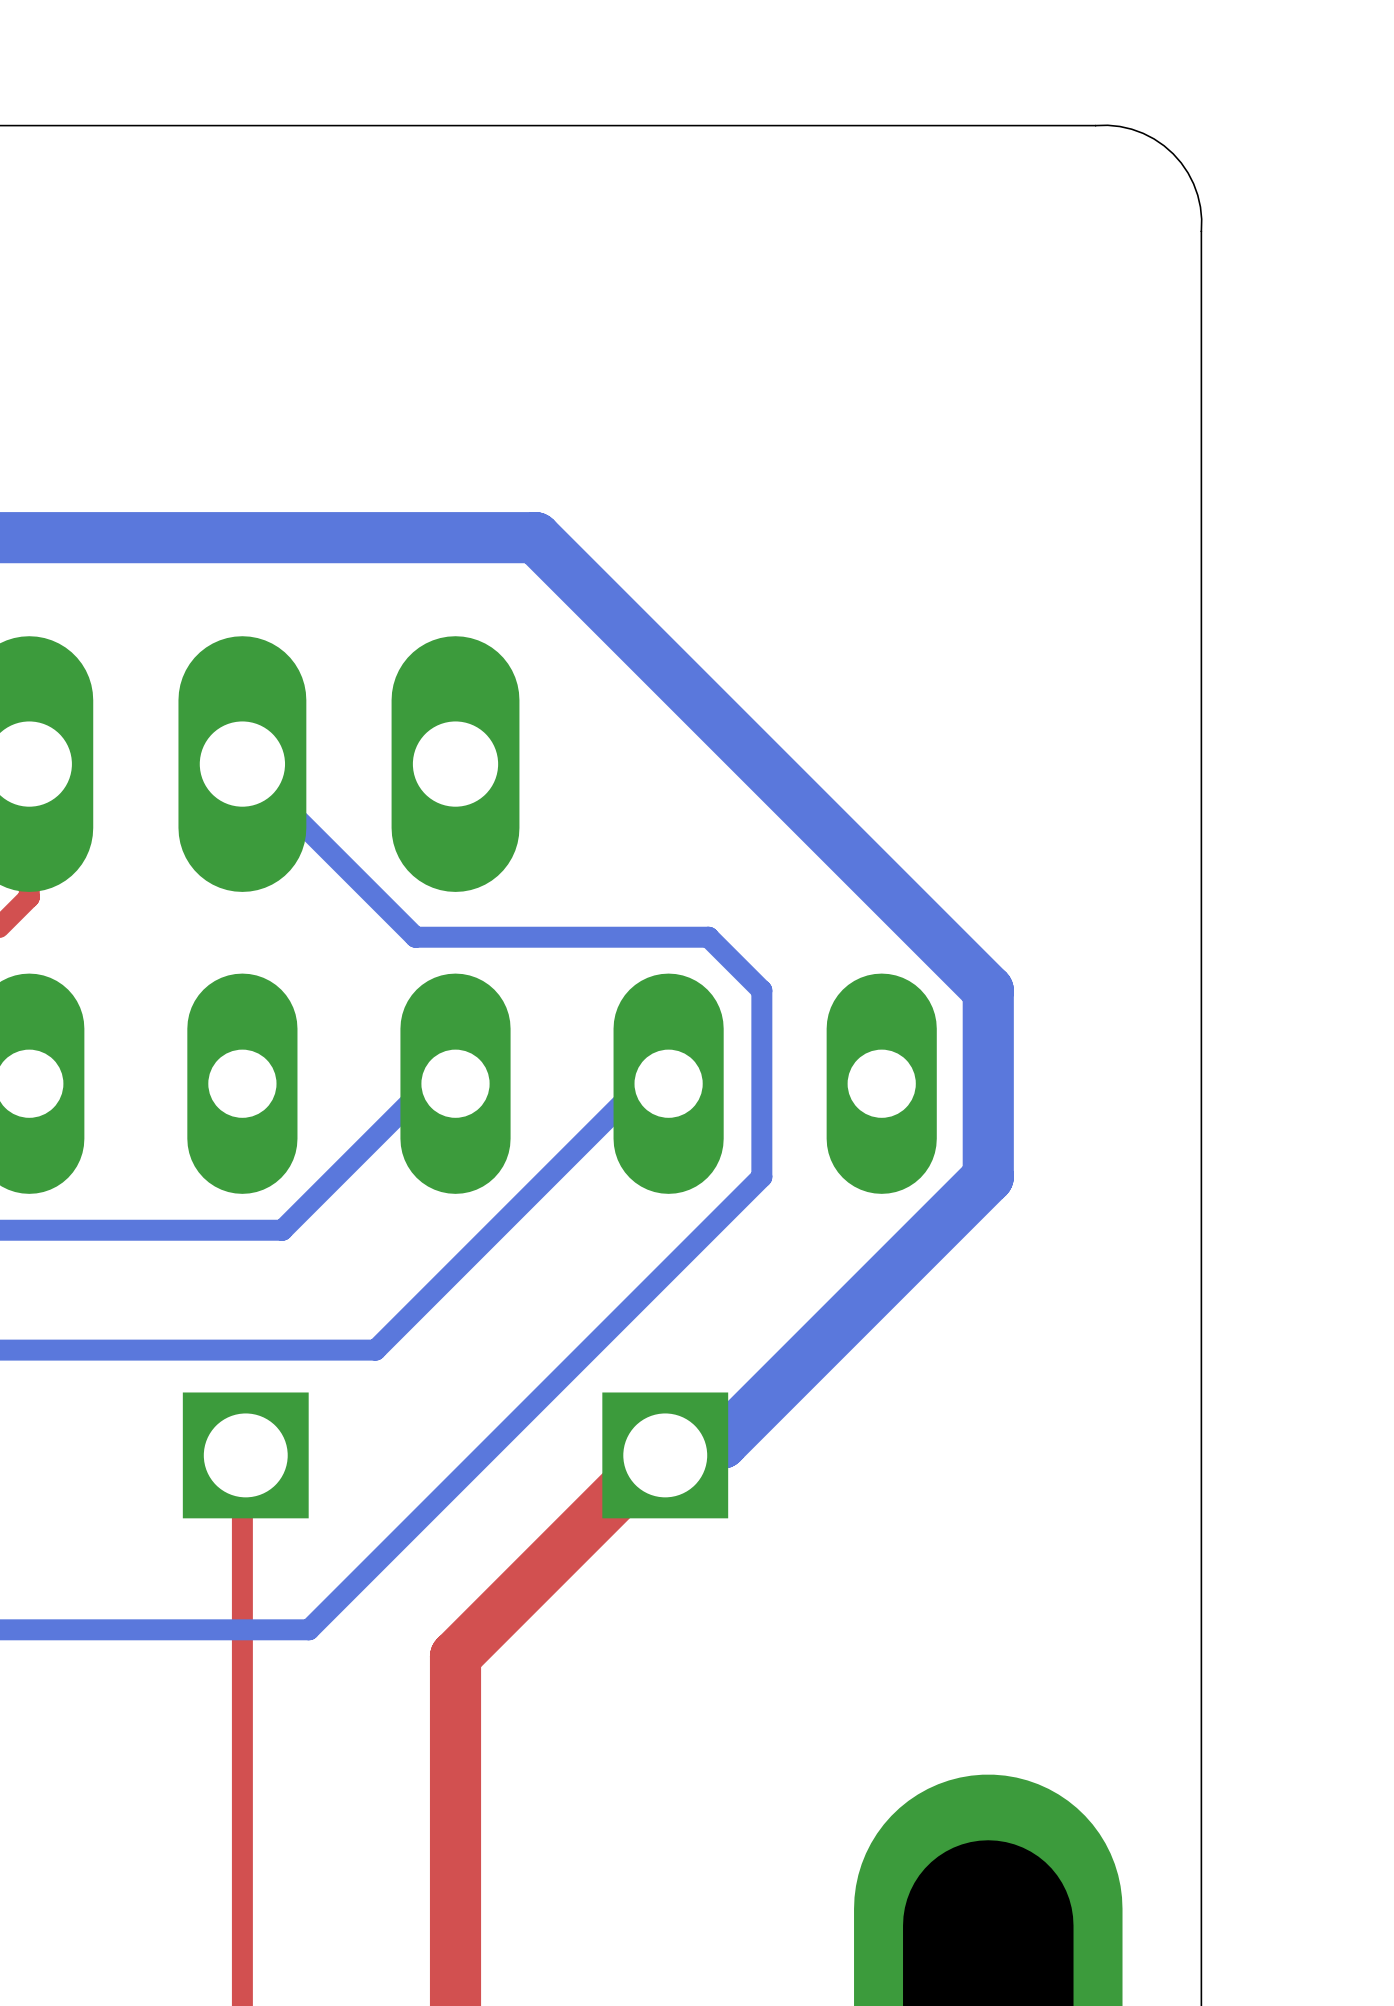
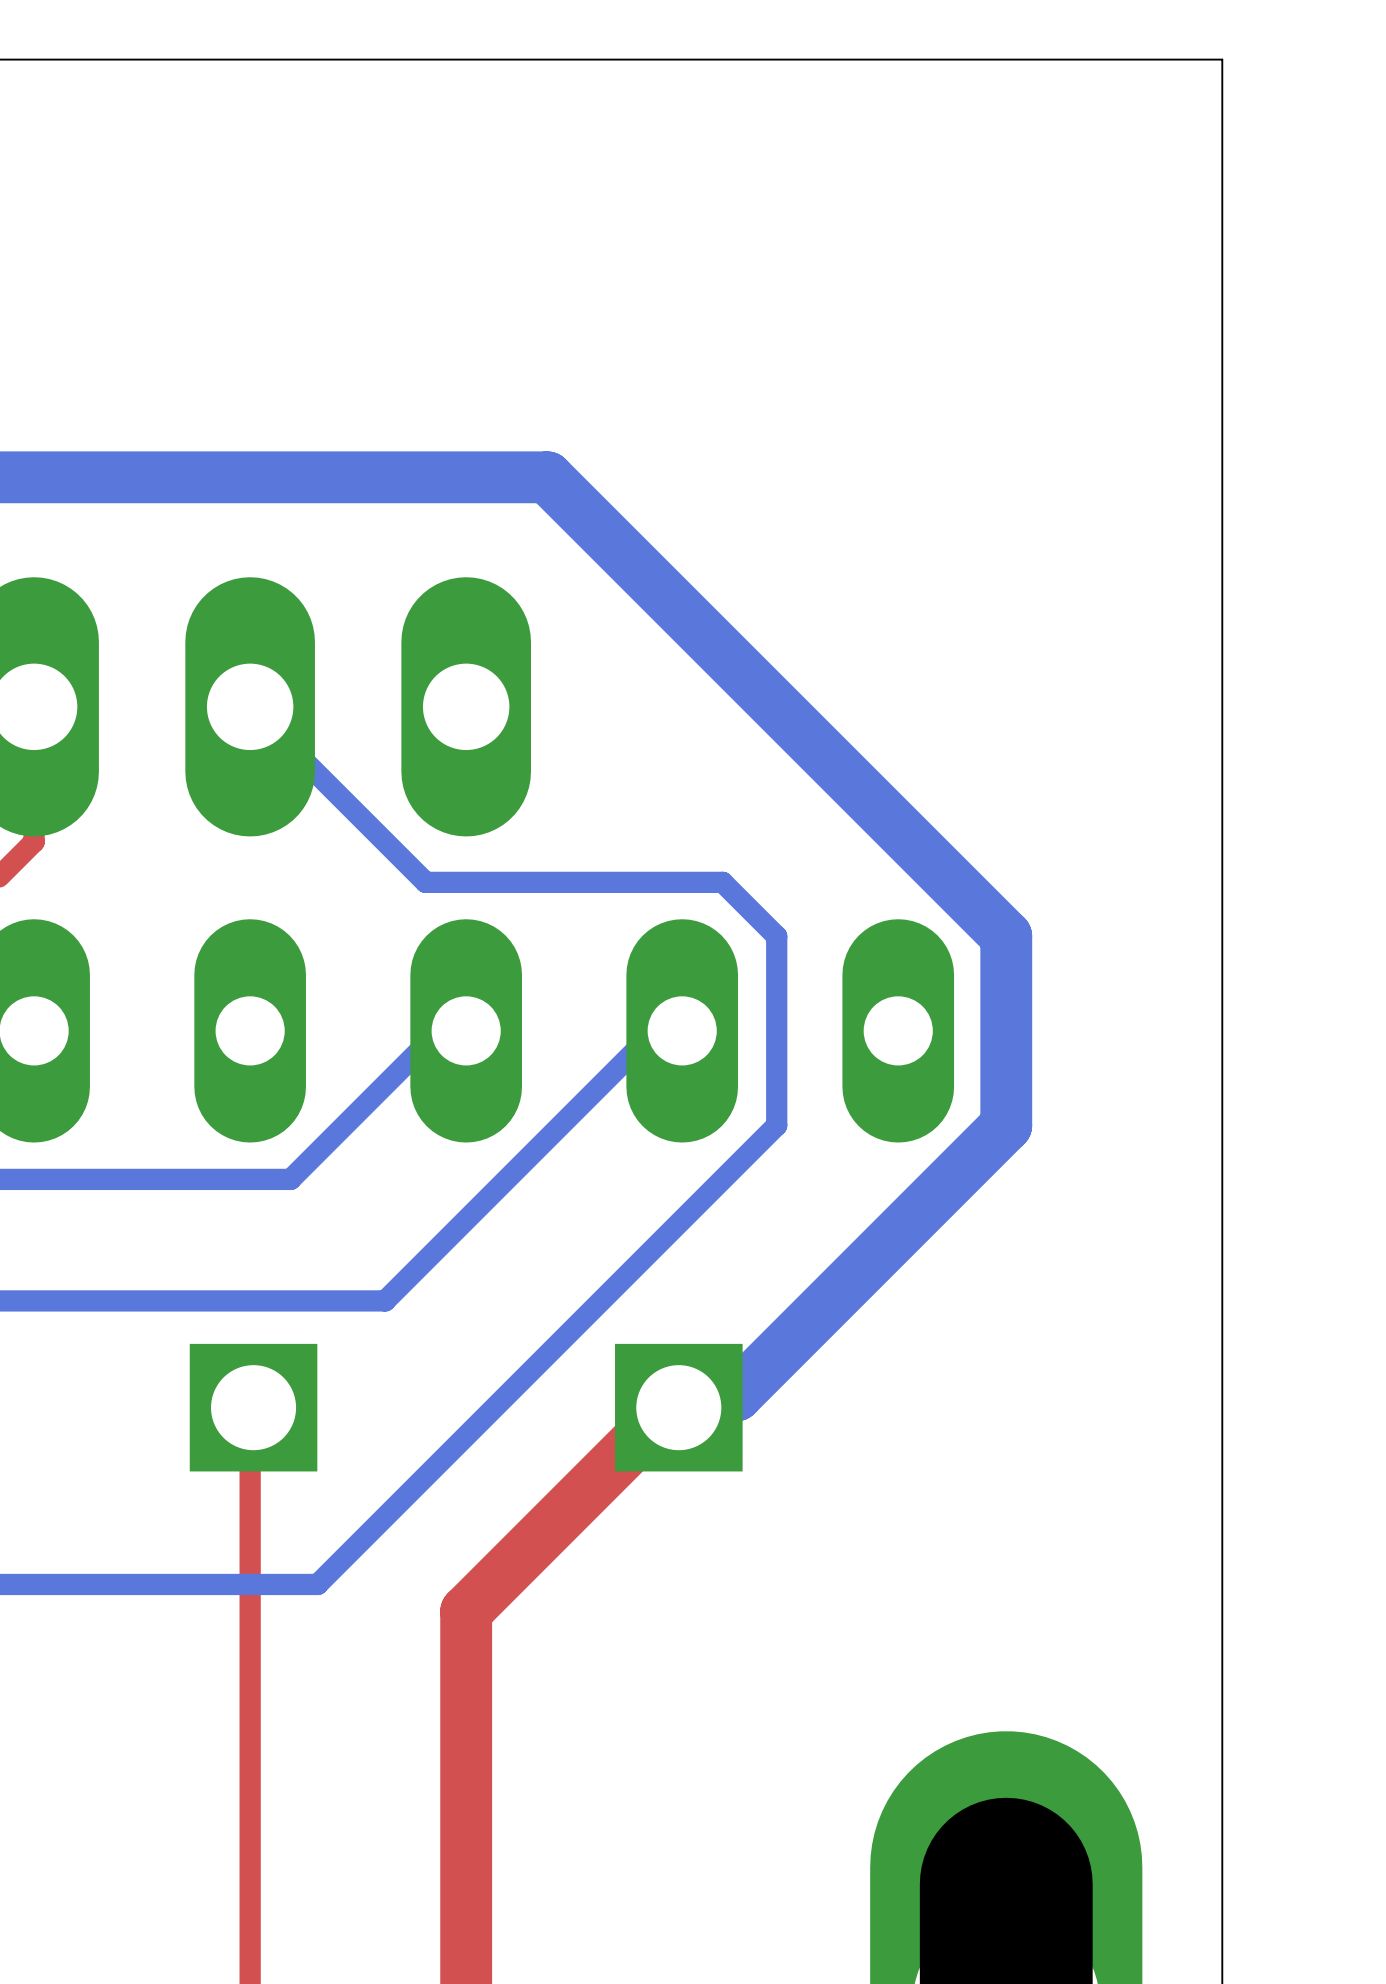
board edge: (1095, 125) (1119, 126) (1143, 133) (1164, 145) (1173, 153) (1181, 162) (1193, 183) (1200, 207) (1201, 231) -> (1115, 59) (1222, 59) (1222, 166)

